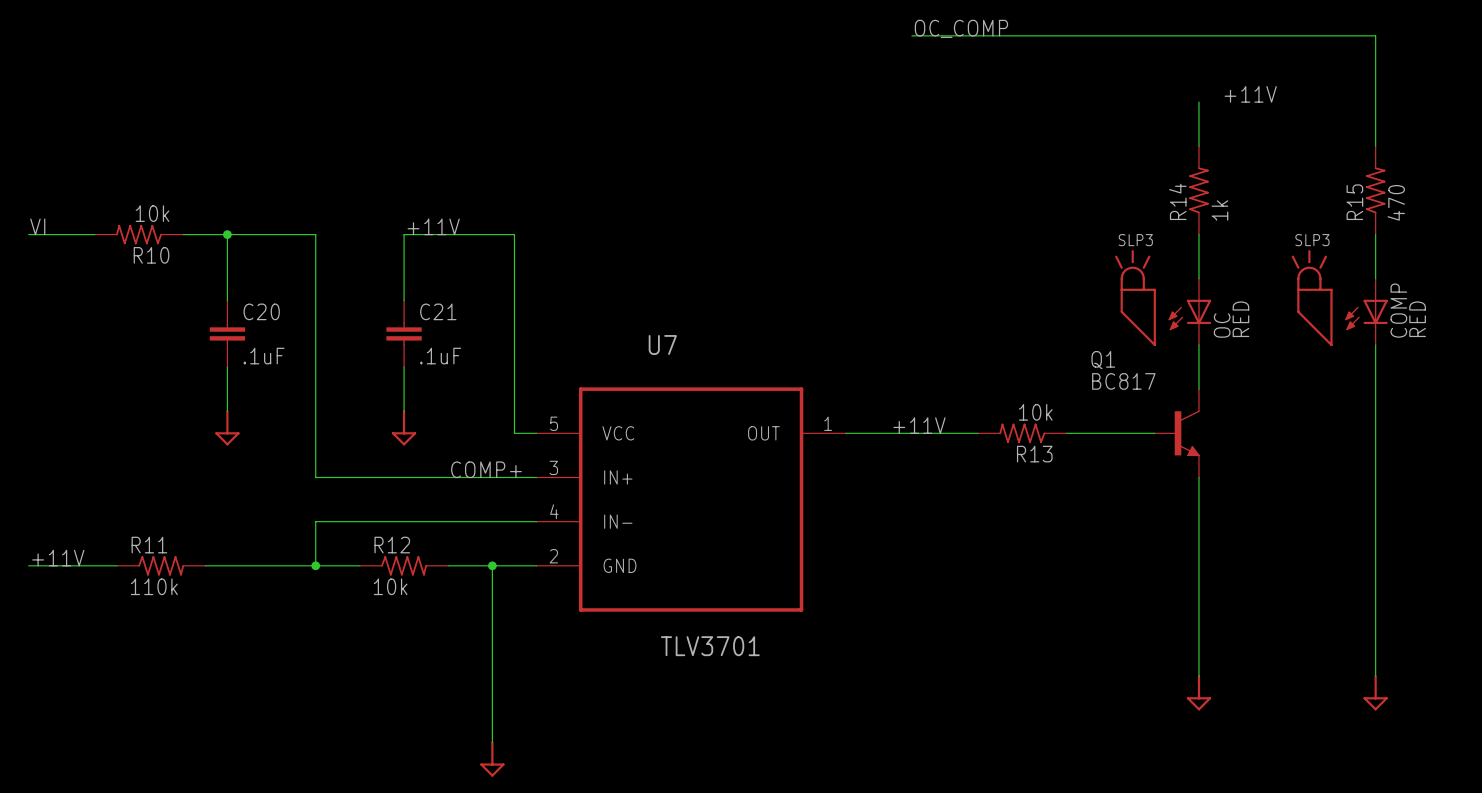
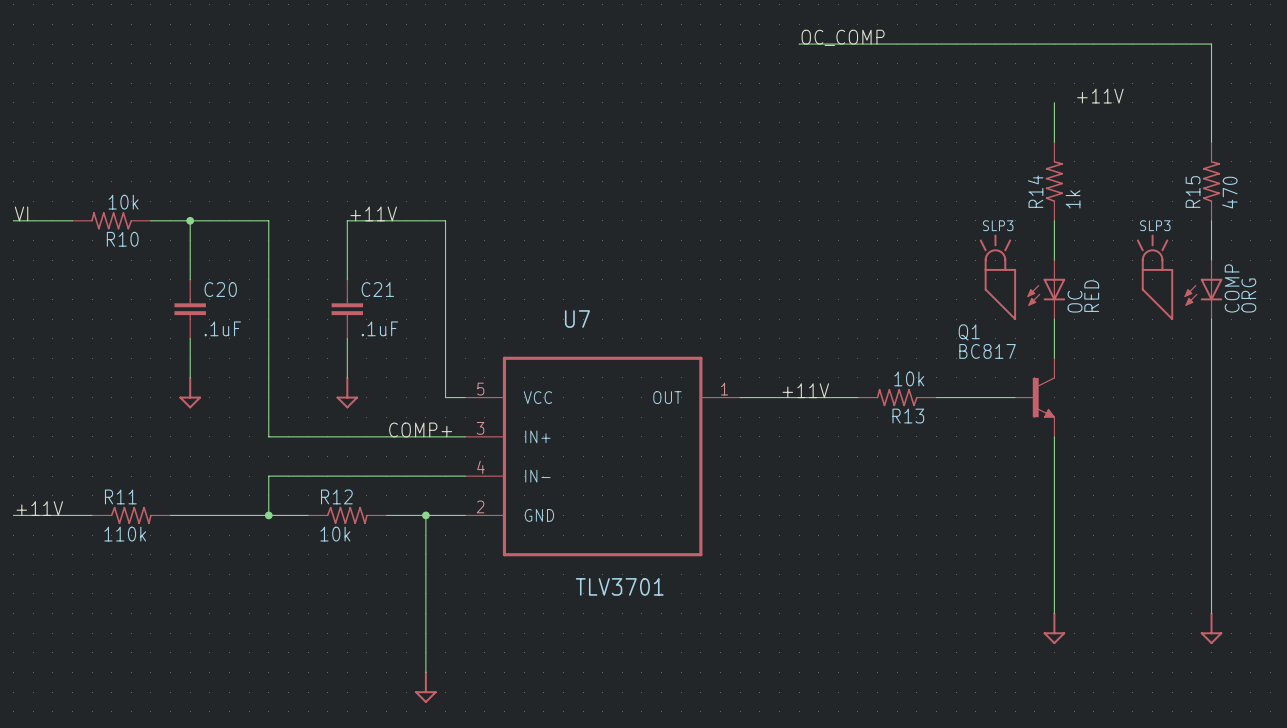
COMP value: RED (1417, 319) -> ORG (1248, 295)

